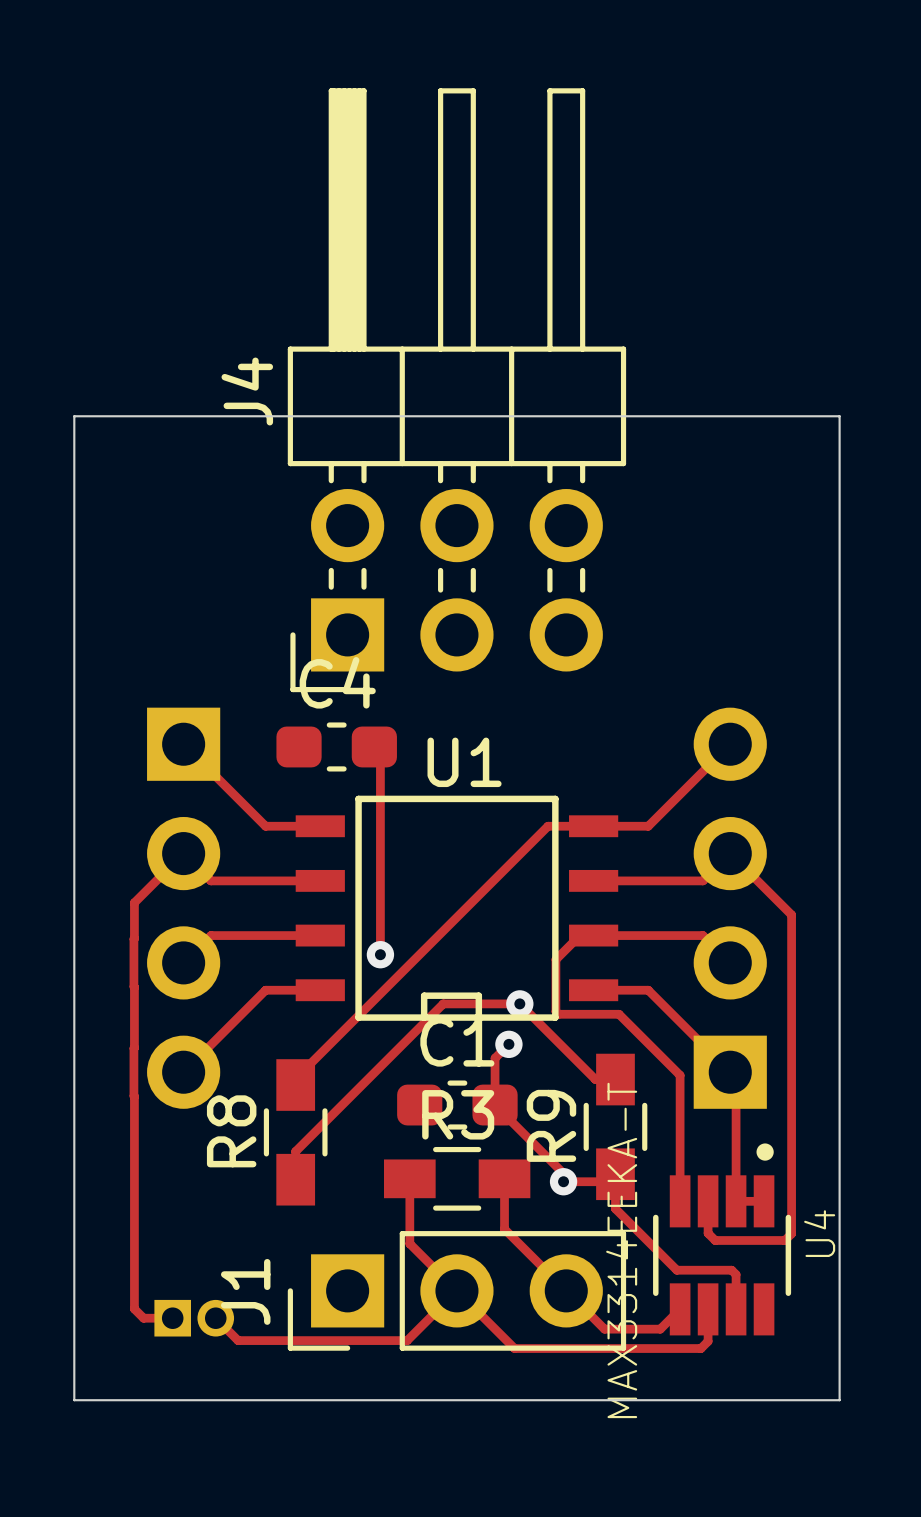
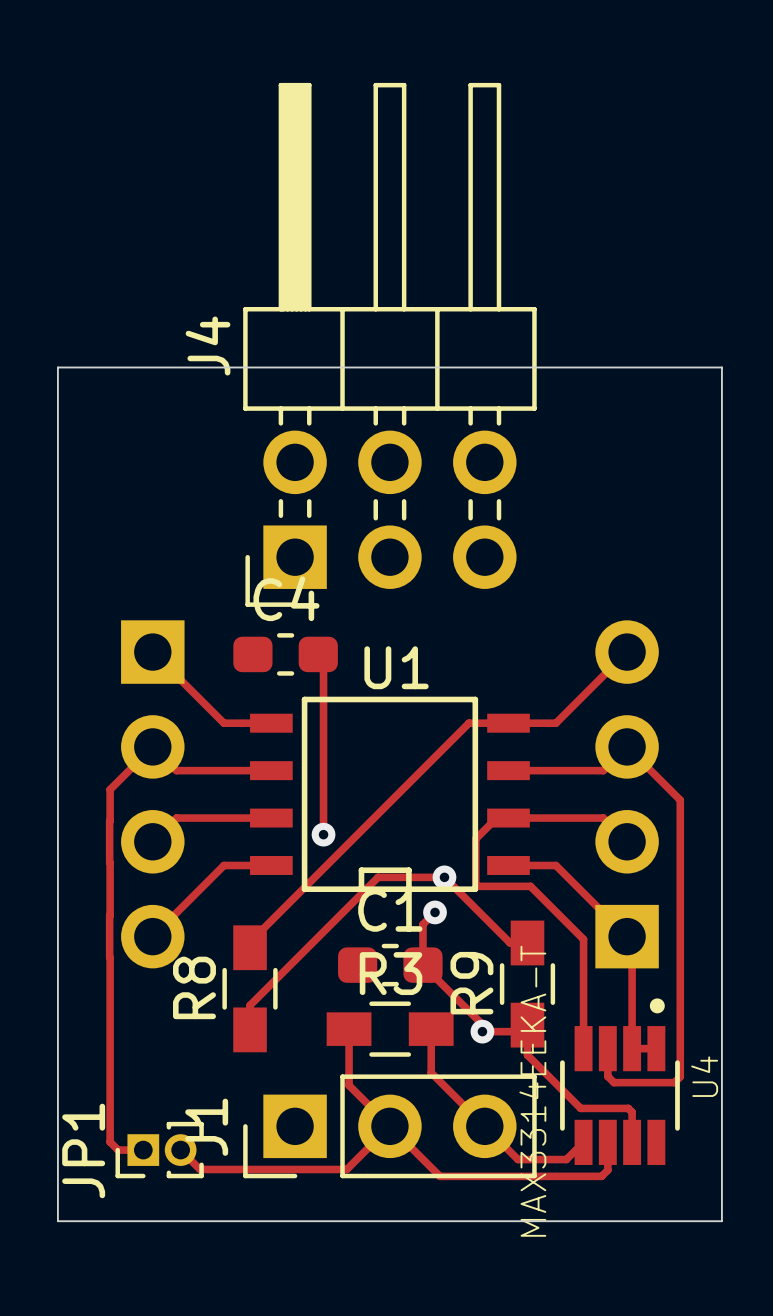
JP1 side: bottom (194, 1318) -> top (159, 1150)

